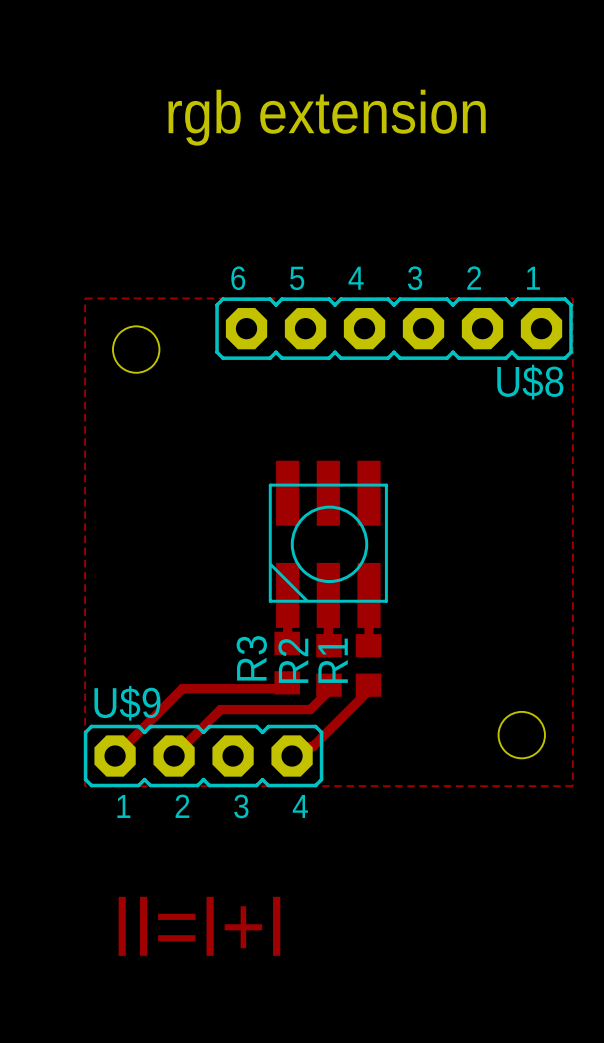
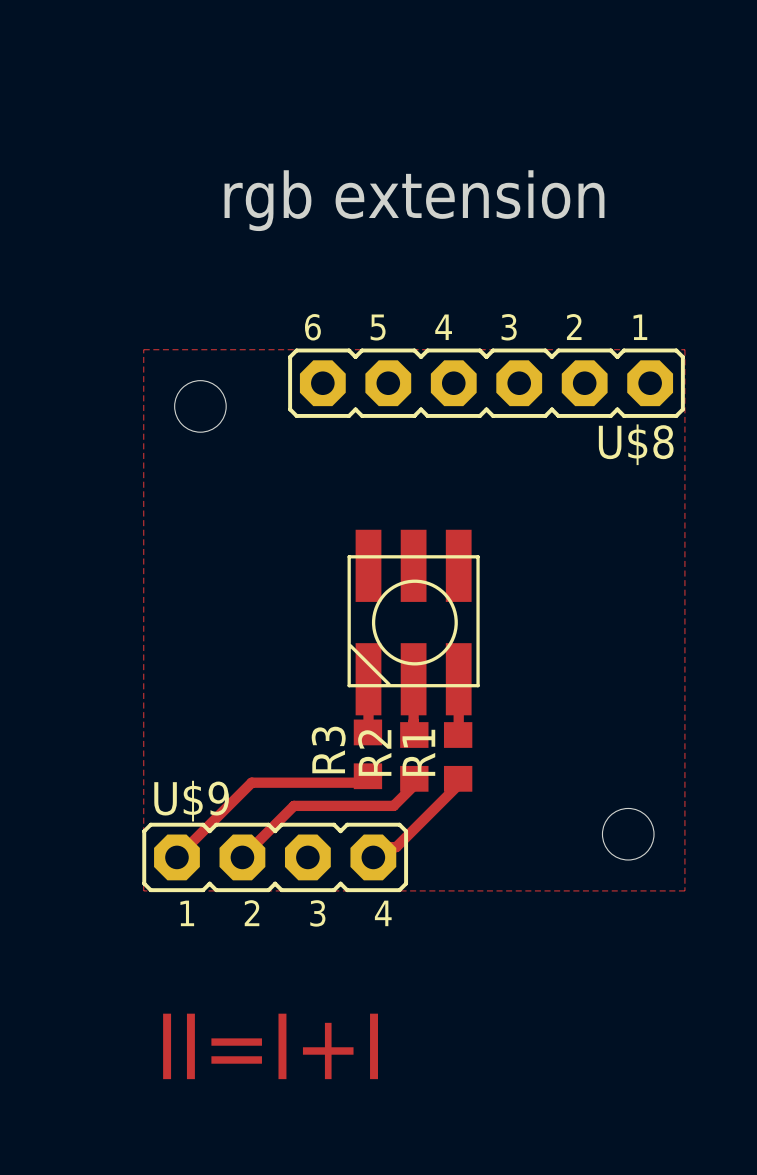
text position: rgb extension (327, 117) -> rgb extension (414, 200)

